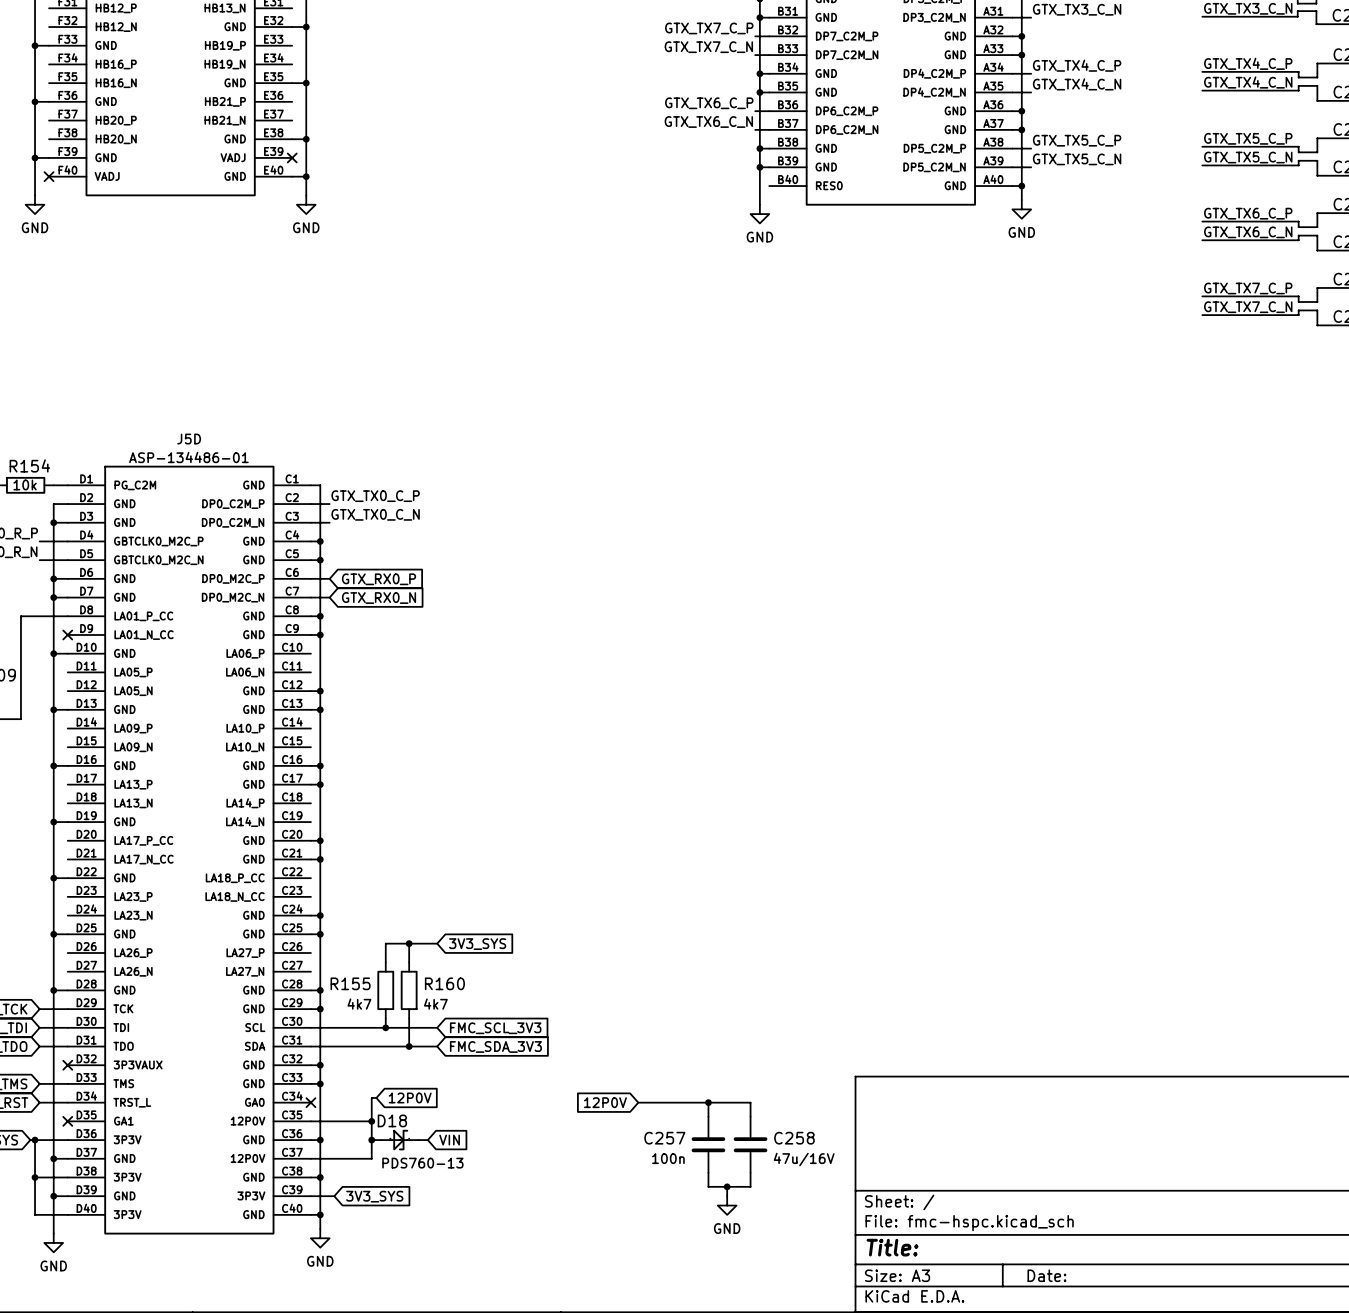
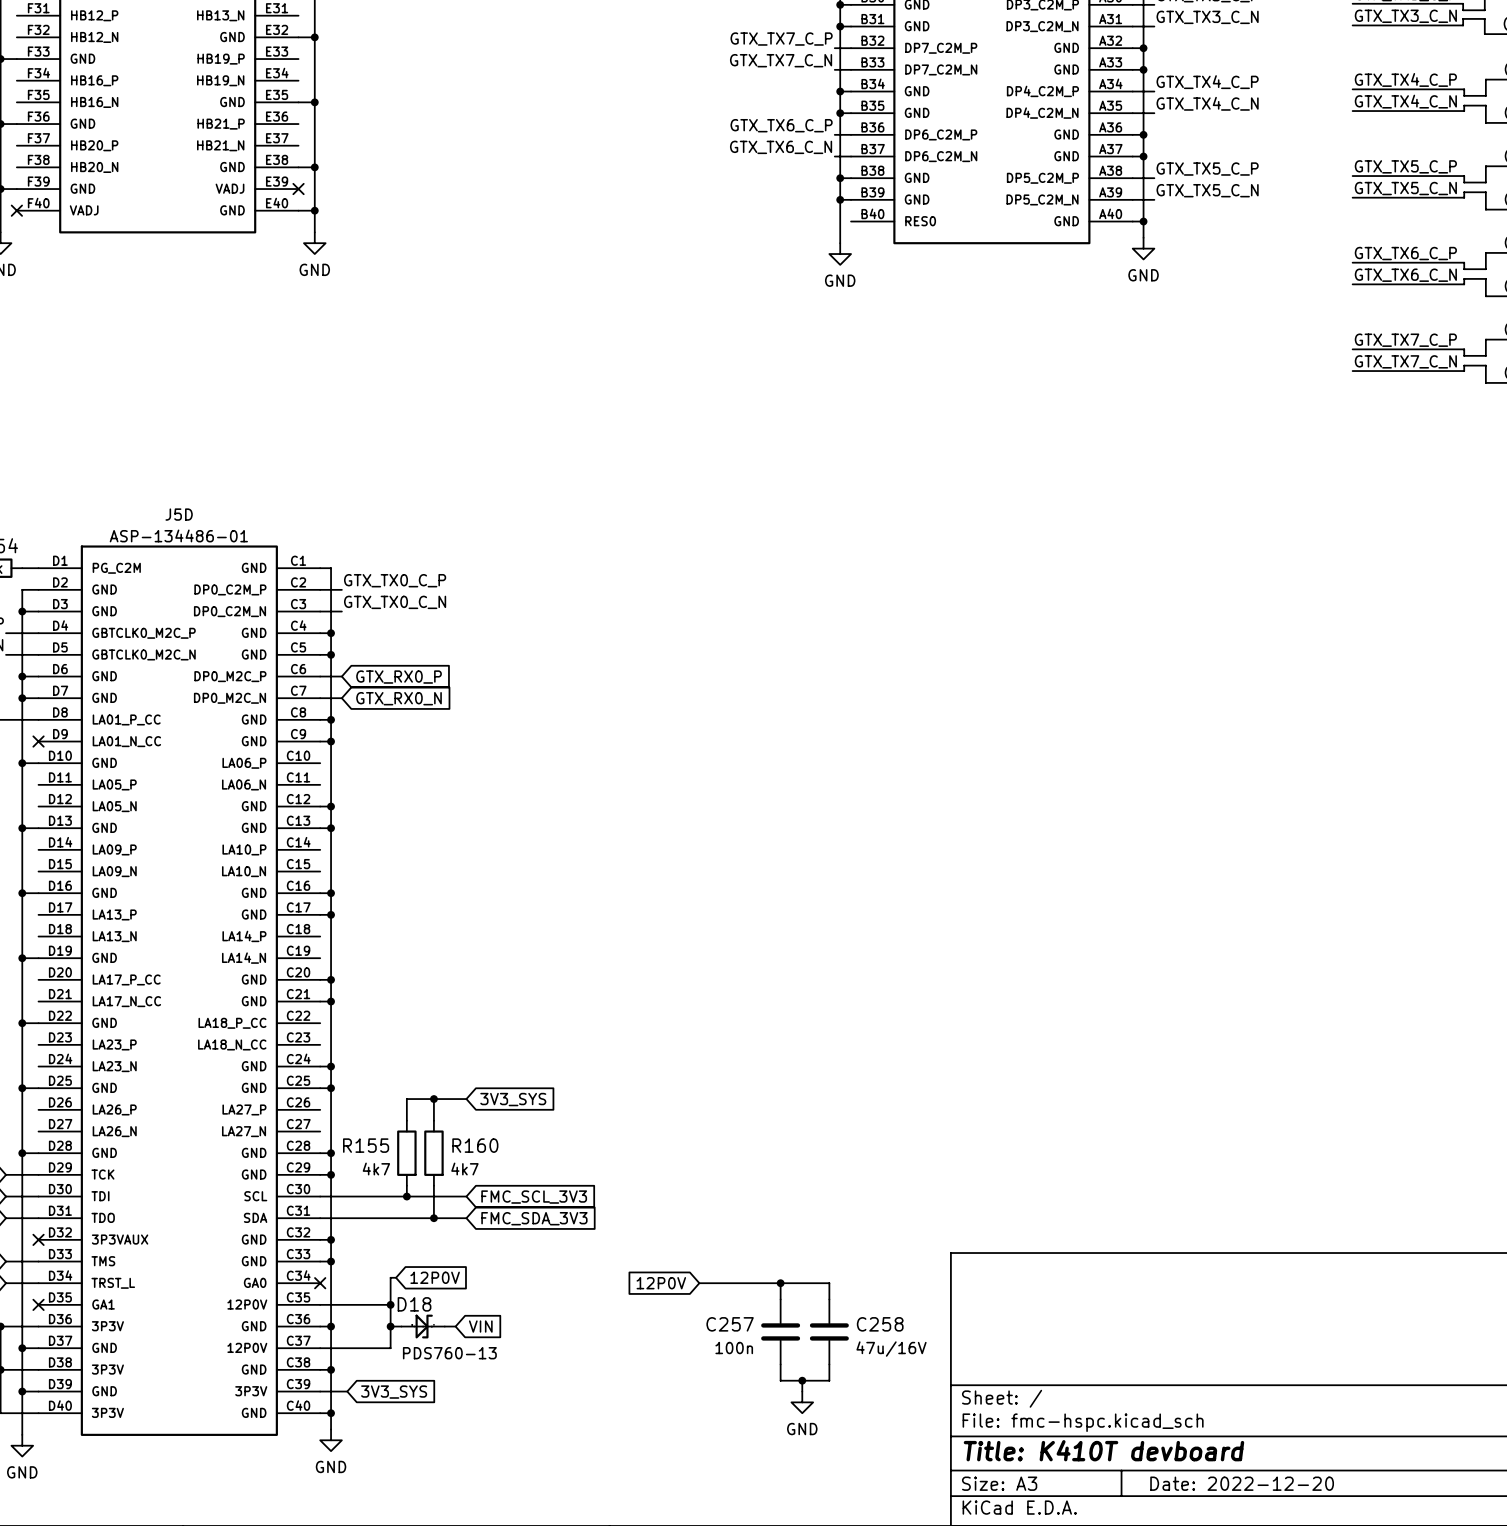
title block: Title: (892, 1247) -> Title: K410T devboard (1103, 1450)
title block: Date: (1046, 1275) -> Date: 2022-12-20 (1242, 1483)

